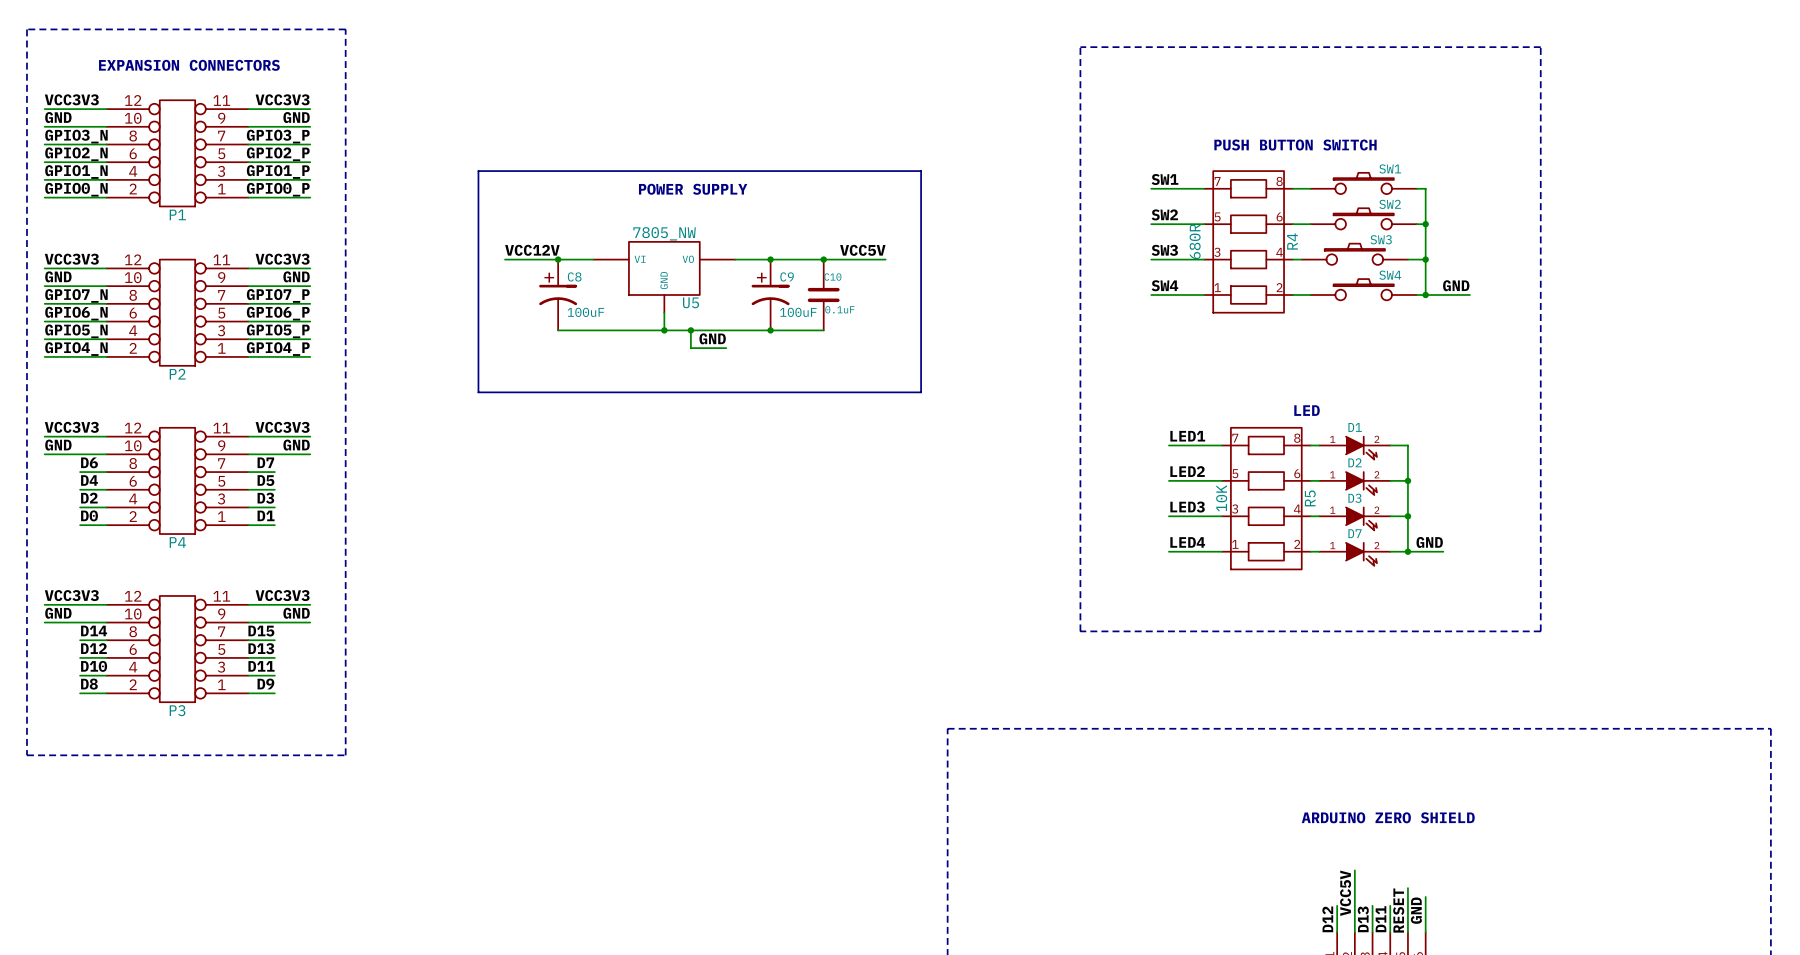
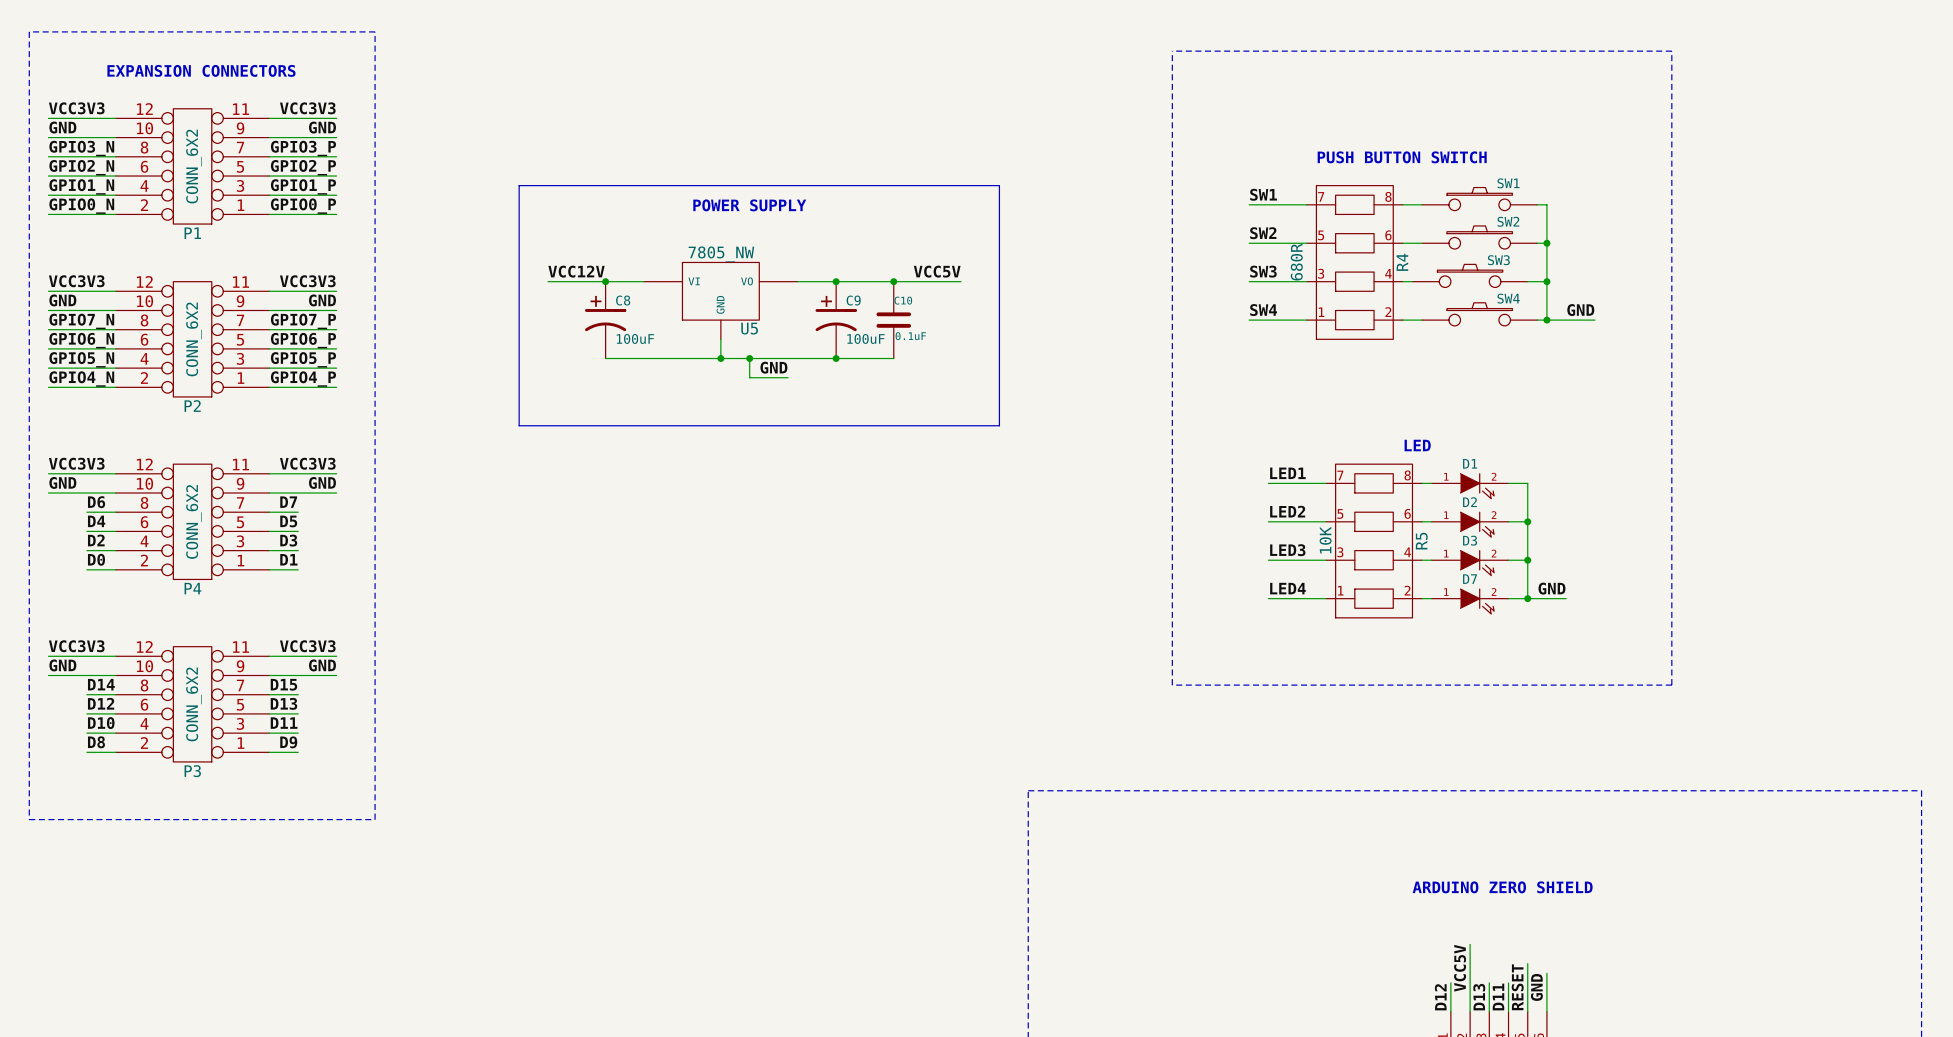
P1 value: none -> CONN_6X2 (193, 166)
P2 value: none -> CONN_6X2 (193, 339)
P4 value: none -> CONN_6X2 (193, 521)
P3 value: none -> CONN_6X2 (193, 704)

